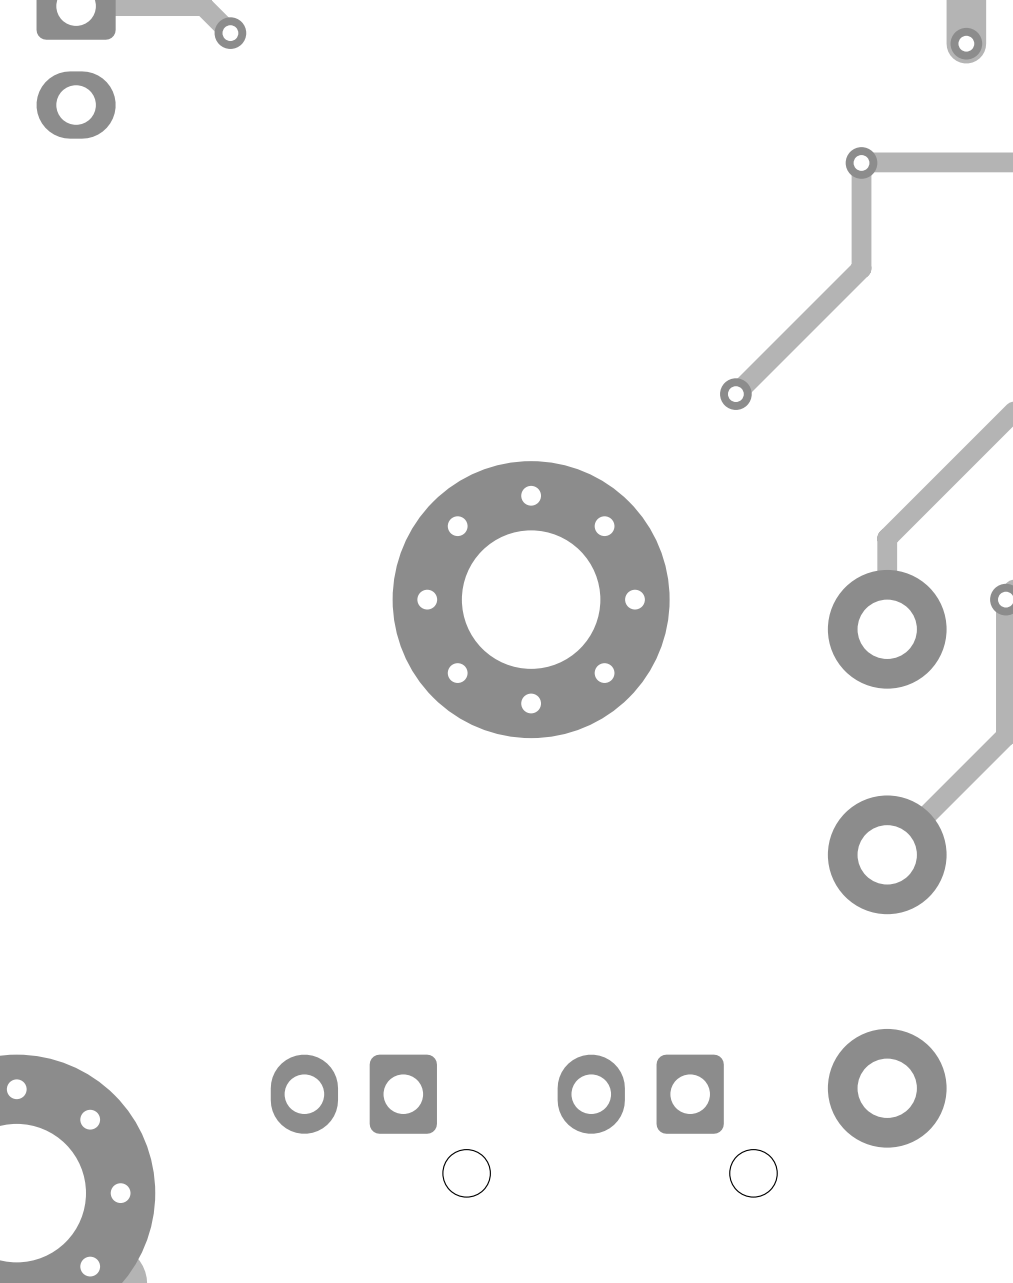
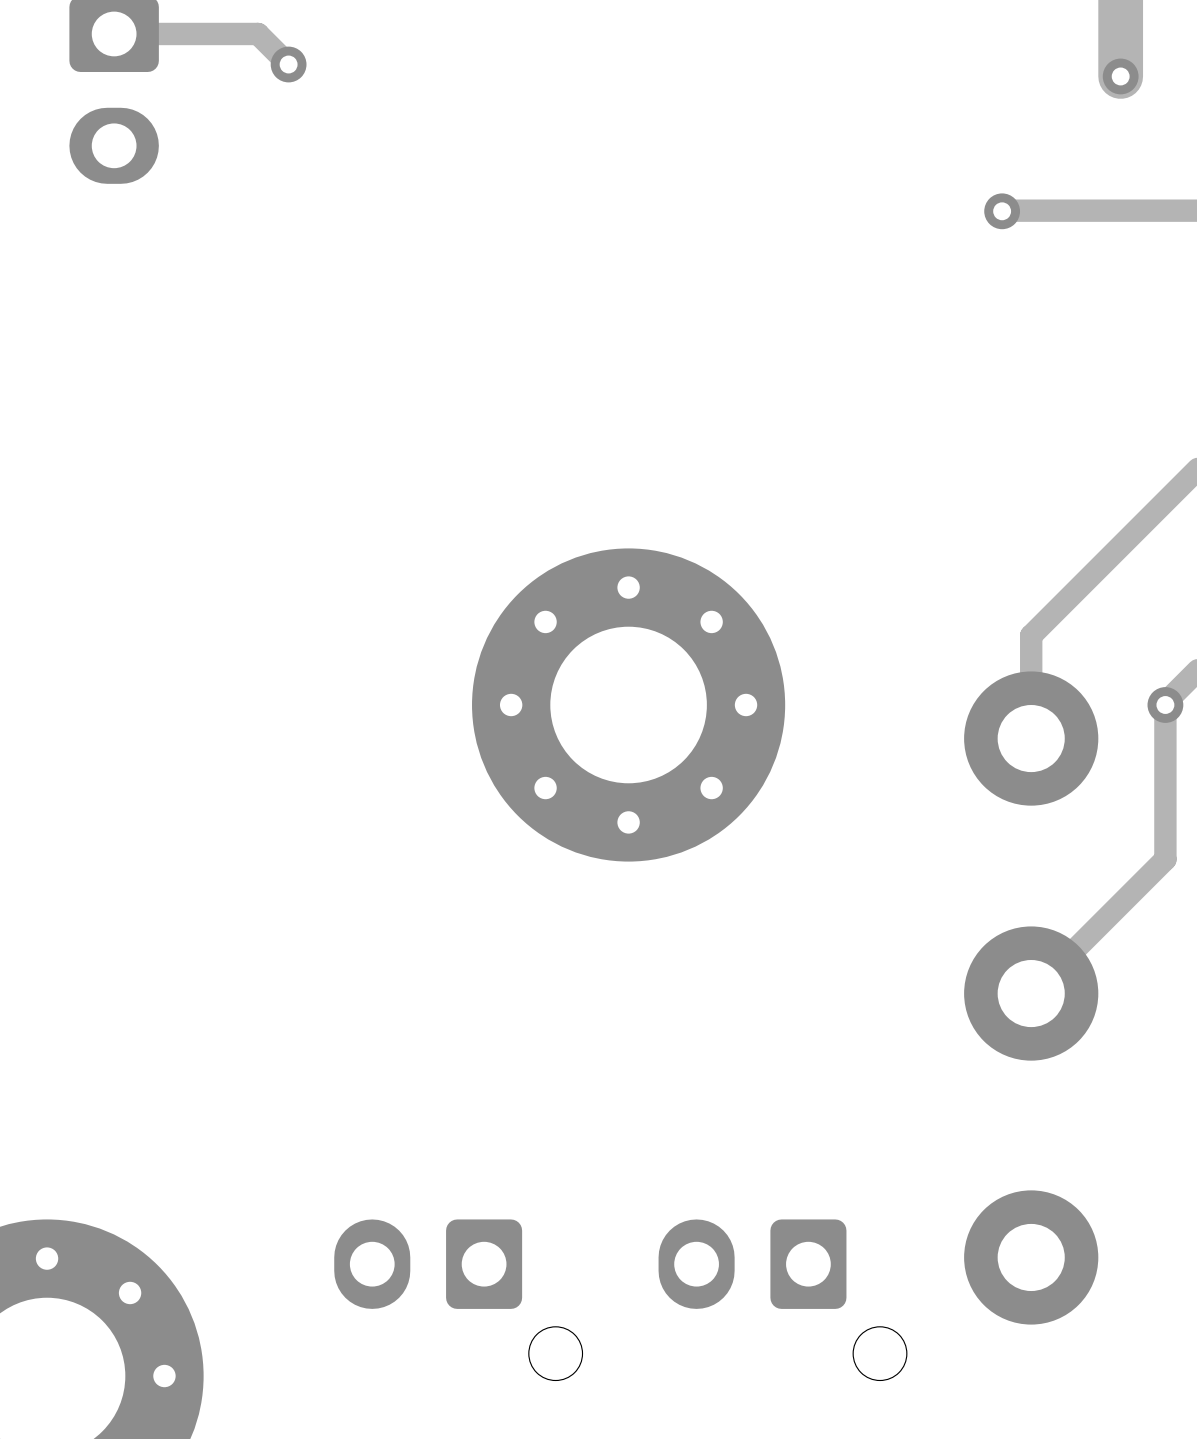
track: (861, 162) (861, 268) (735, 394) -> none
via: (735, 394) -> none

